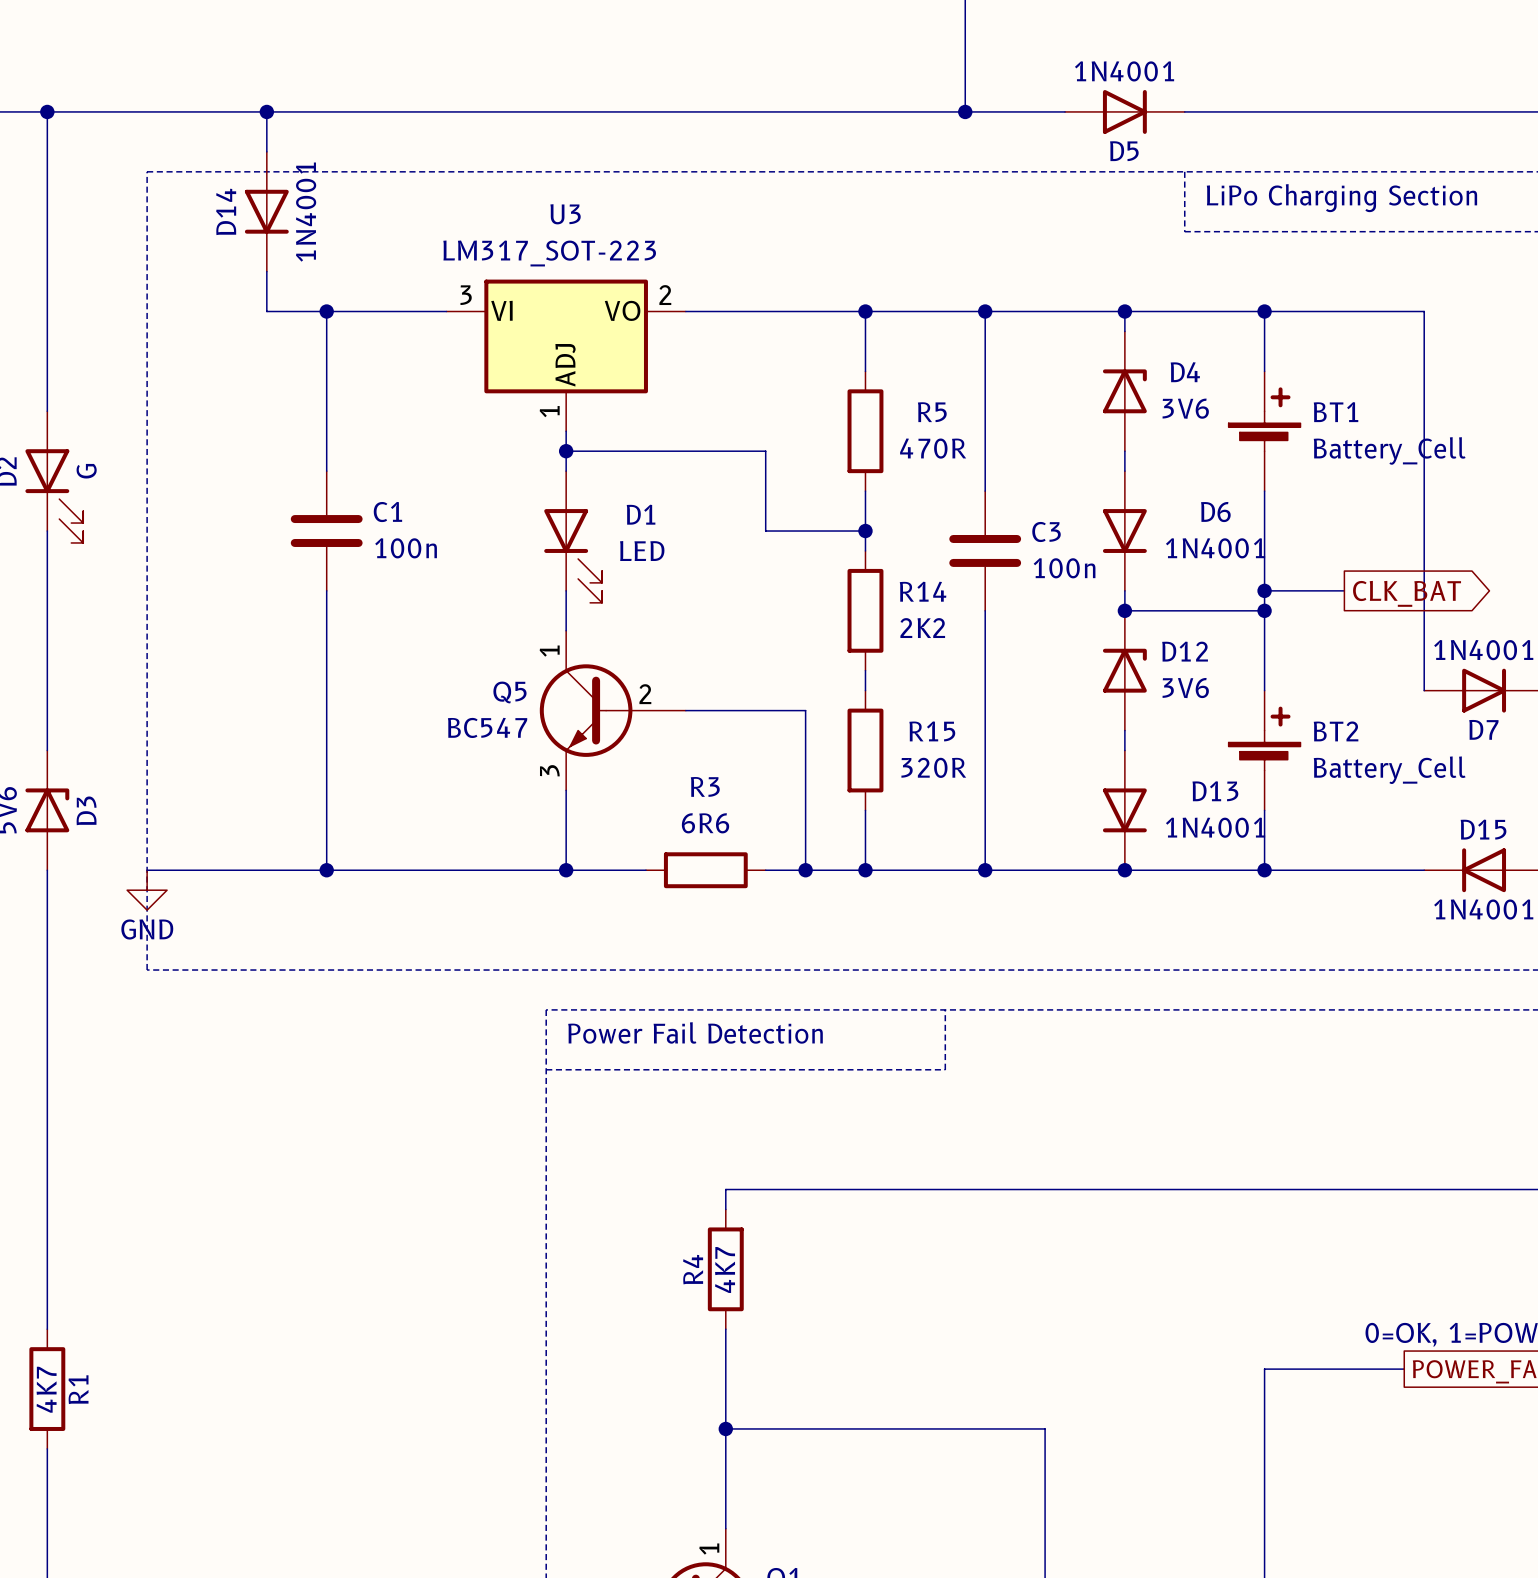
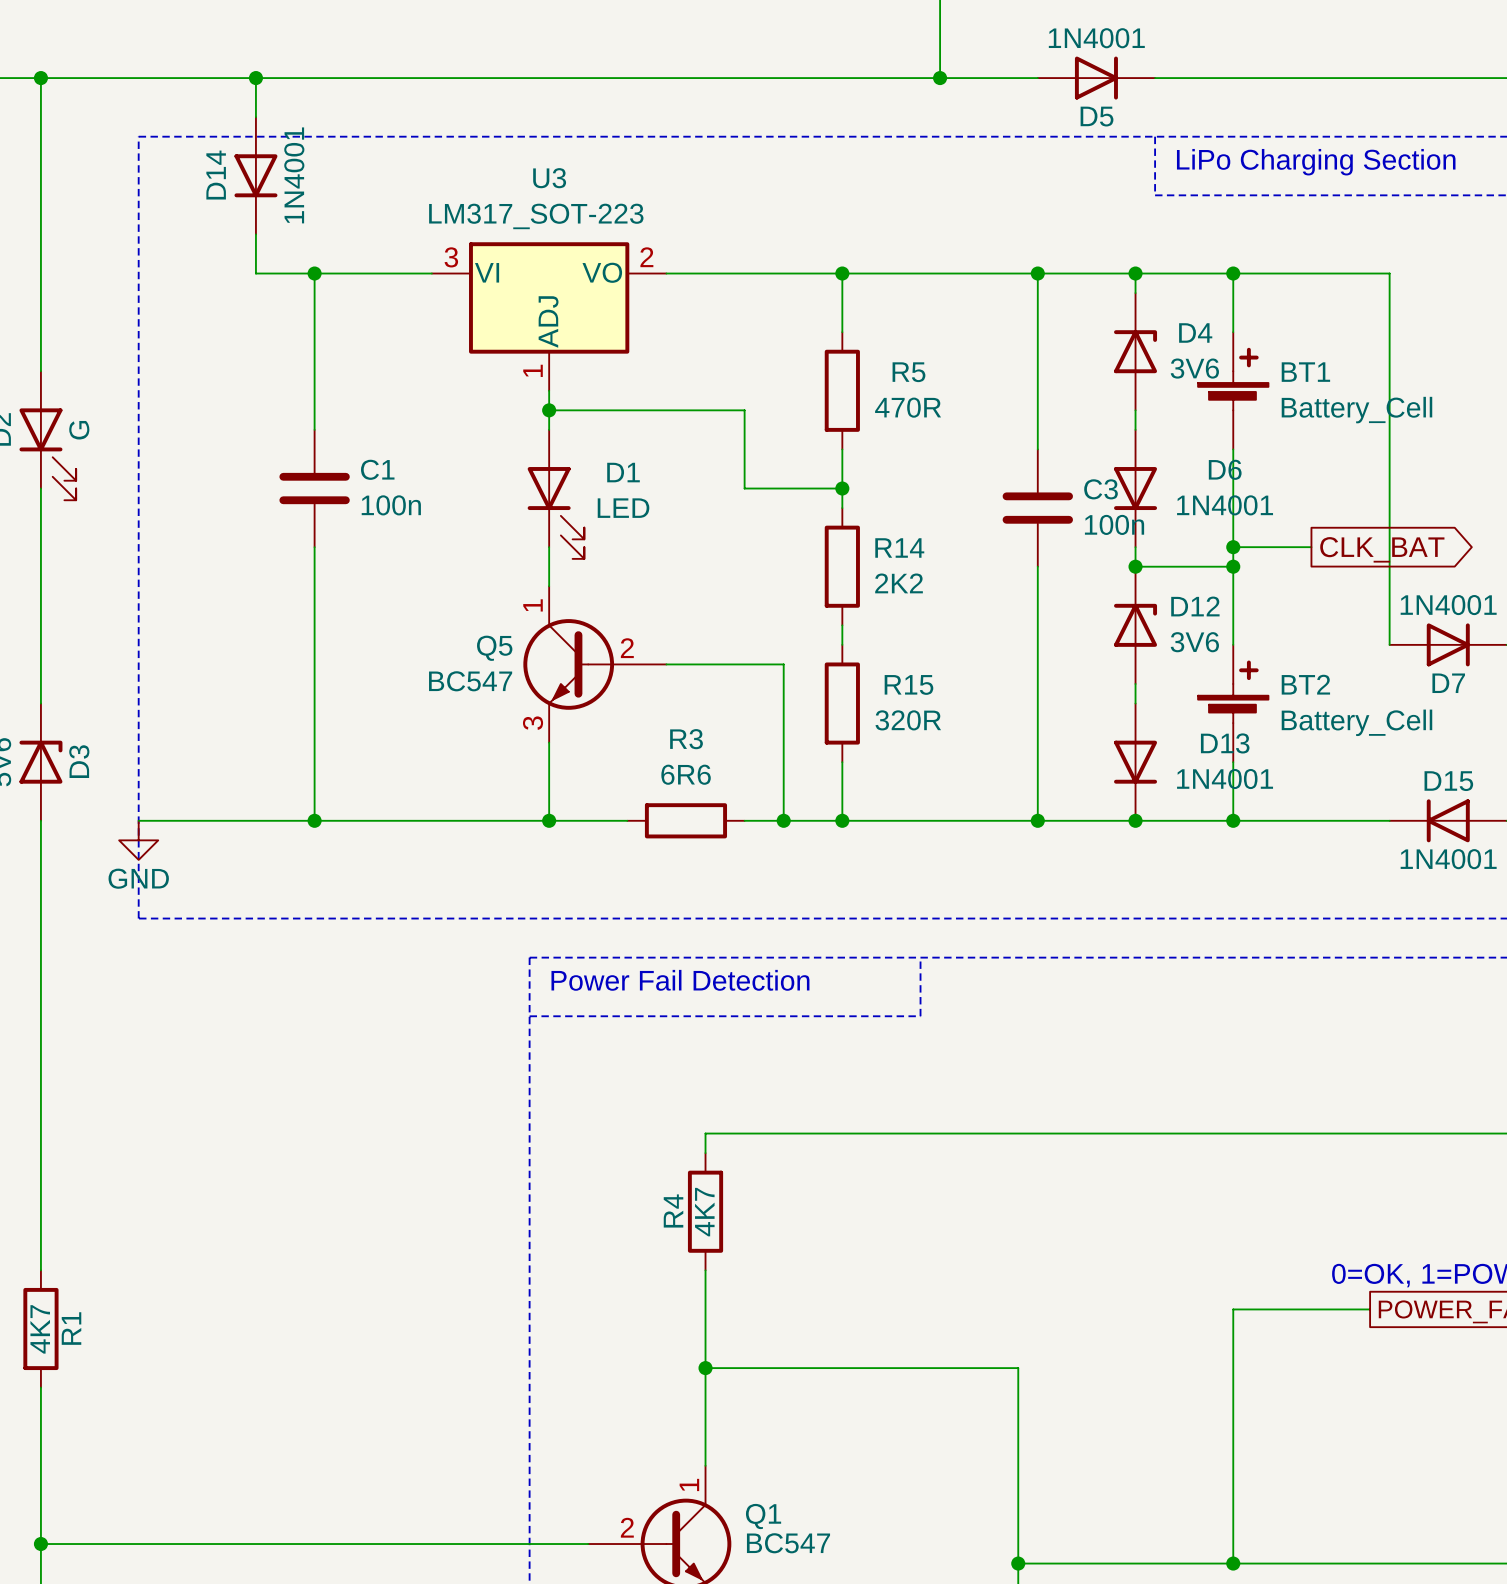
wire: (985, 311) (985, 491) -> (1037, 273) (1037, 449)
junction: (985, 311) -> none
junction: none -> (1037, 273)
wire: (1124, 311) (1124, 331) -> (1135, 273) (1135, 293)
junction: (1124, 311) -> none
junction: none -> (1135, 273)
D4 position: (1124, 391) -> (1135, 351)
wire: (1124, 451) (1124, 471) -> (1135, 410) (1135, 429)
D6 position: (1124, 531) -> (1135, 488)
C3 position: (985, 550) -> (1037, 508)
wire: (1124, 590) (1124, 610) (1164, 610) -> (1135, 547) (1135, 566)
wire: (985, 610) (985, 870) -> (1037, 566) (1037, 820)
junction position: (1124, 610) -> (1135, 566)
D12 position: (1124, 670) -> (1135, 625)
wire: (1124, 730) (1124, 750) -> (1135, 683) (1135, 703)
D13 position: (1124, 810) -> (1135, 762)
junction: (985, 870) -> none
junction: none -> (1037, 820)
junction: (1124, 870) -> none
junction: none -> (1135, 820)

